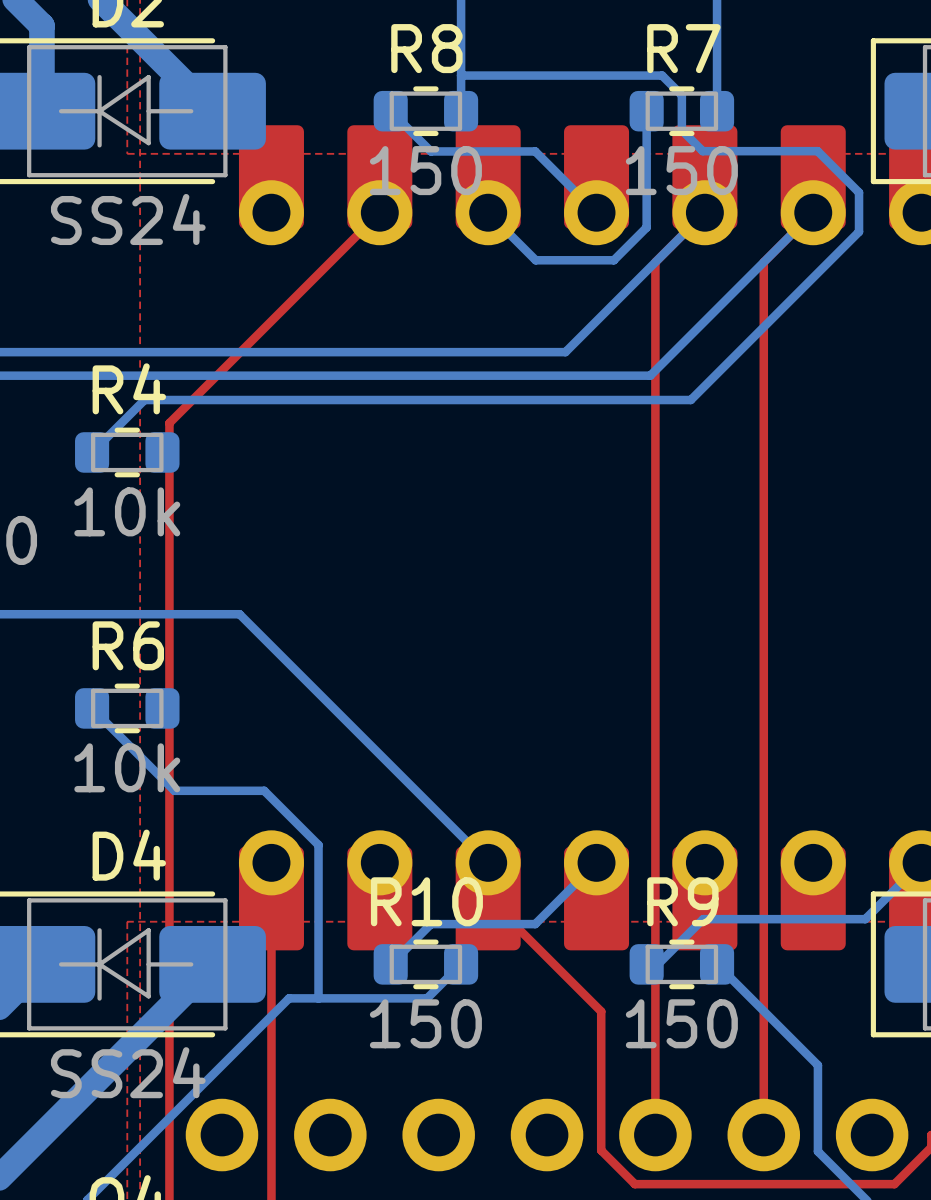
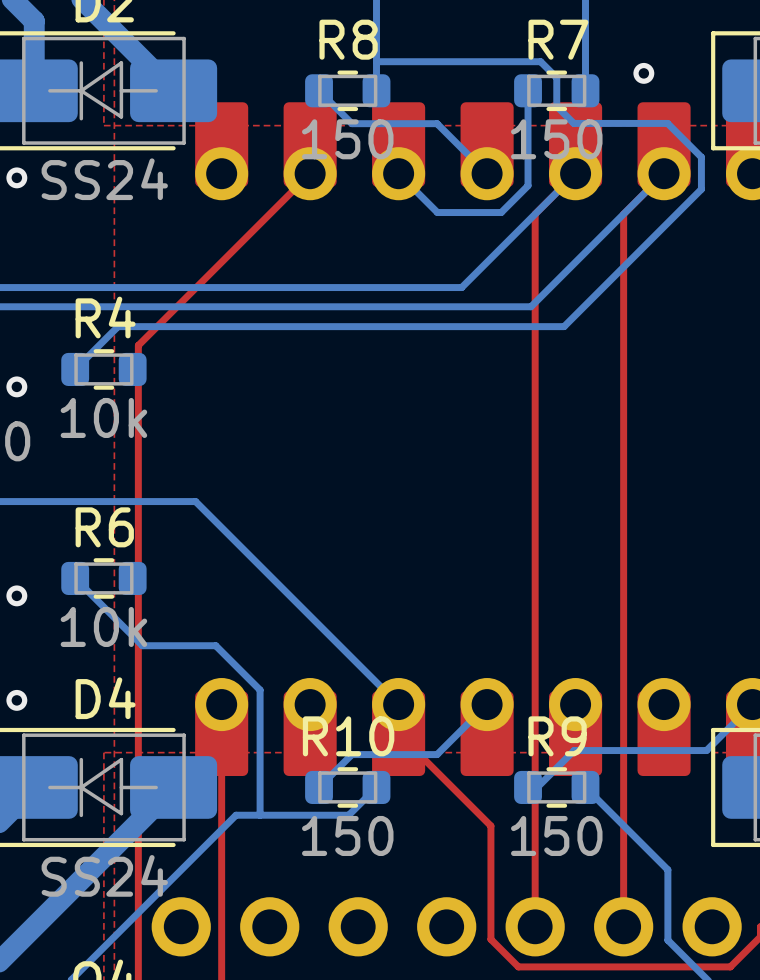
via: none -> (643, 73)
via: none -> (16, 177)
via: none -> (16, 386)
via: none -> (16, 595)
via: none -> (16, 700)

